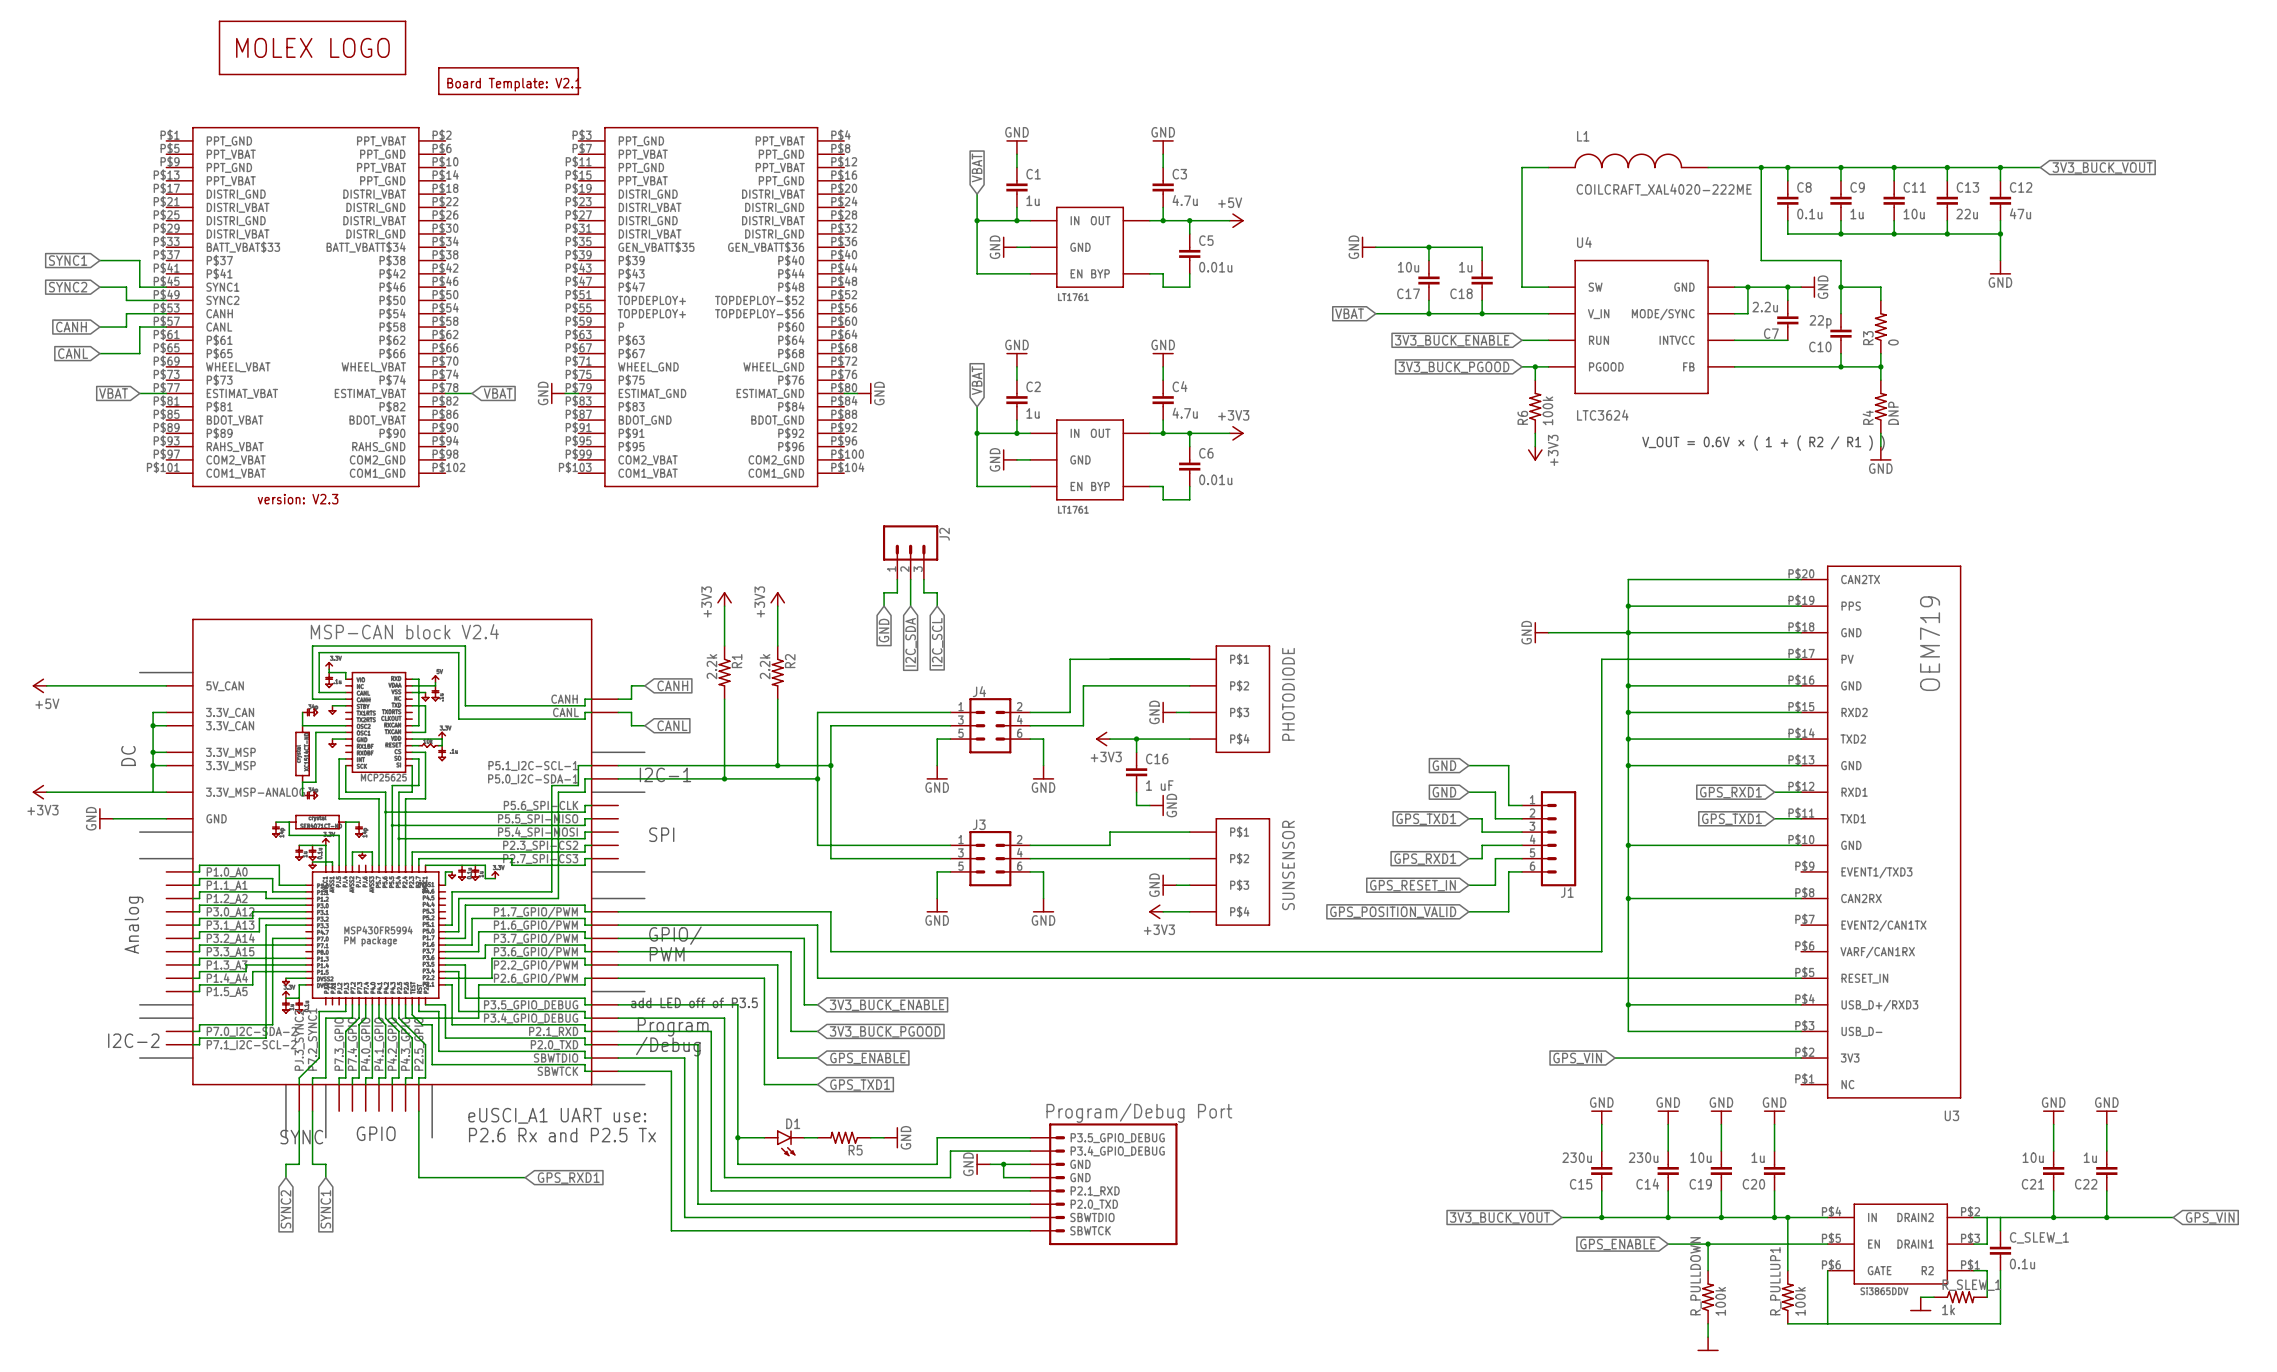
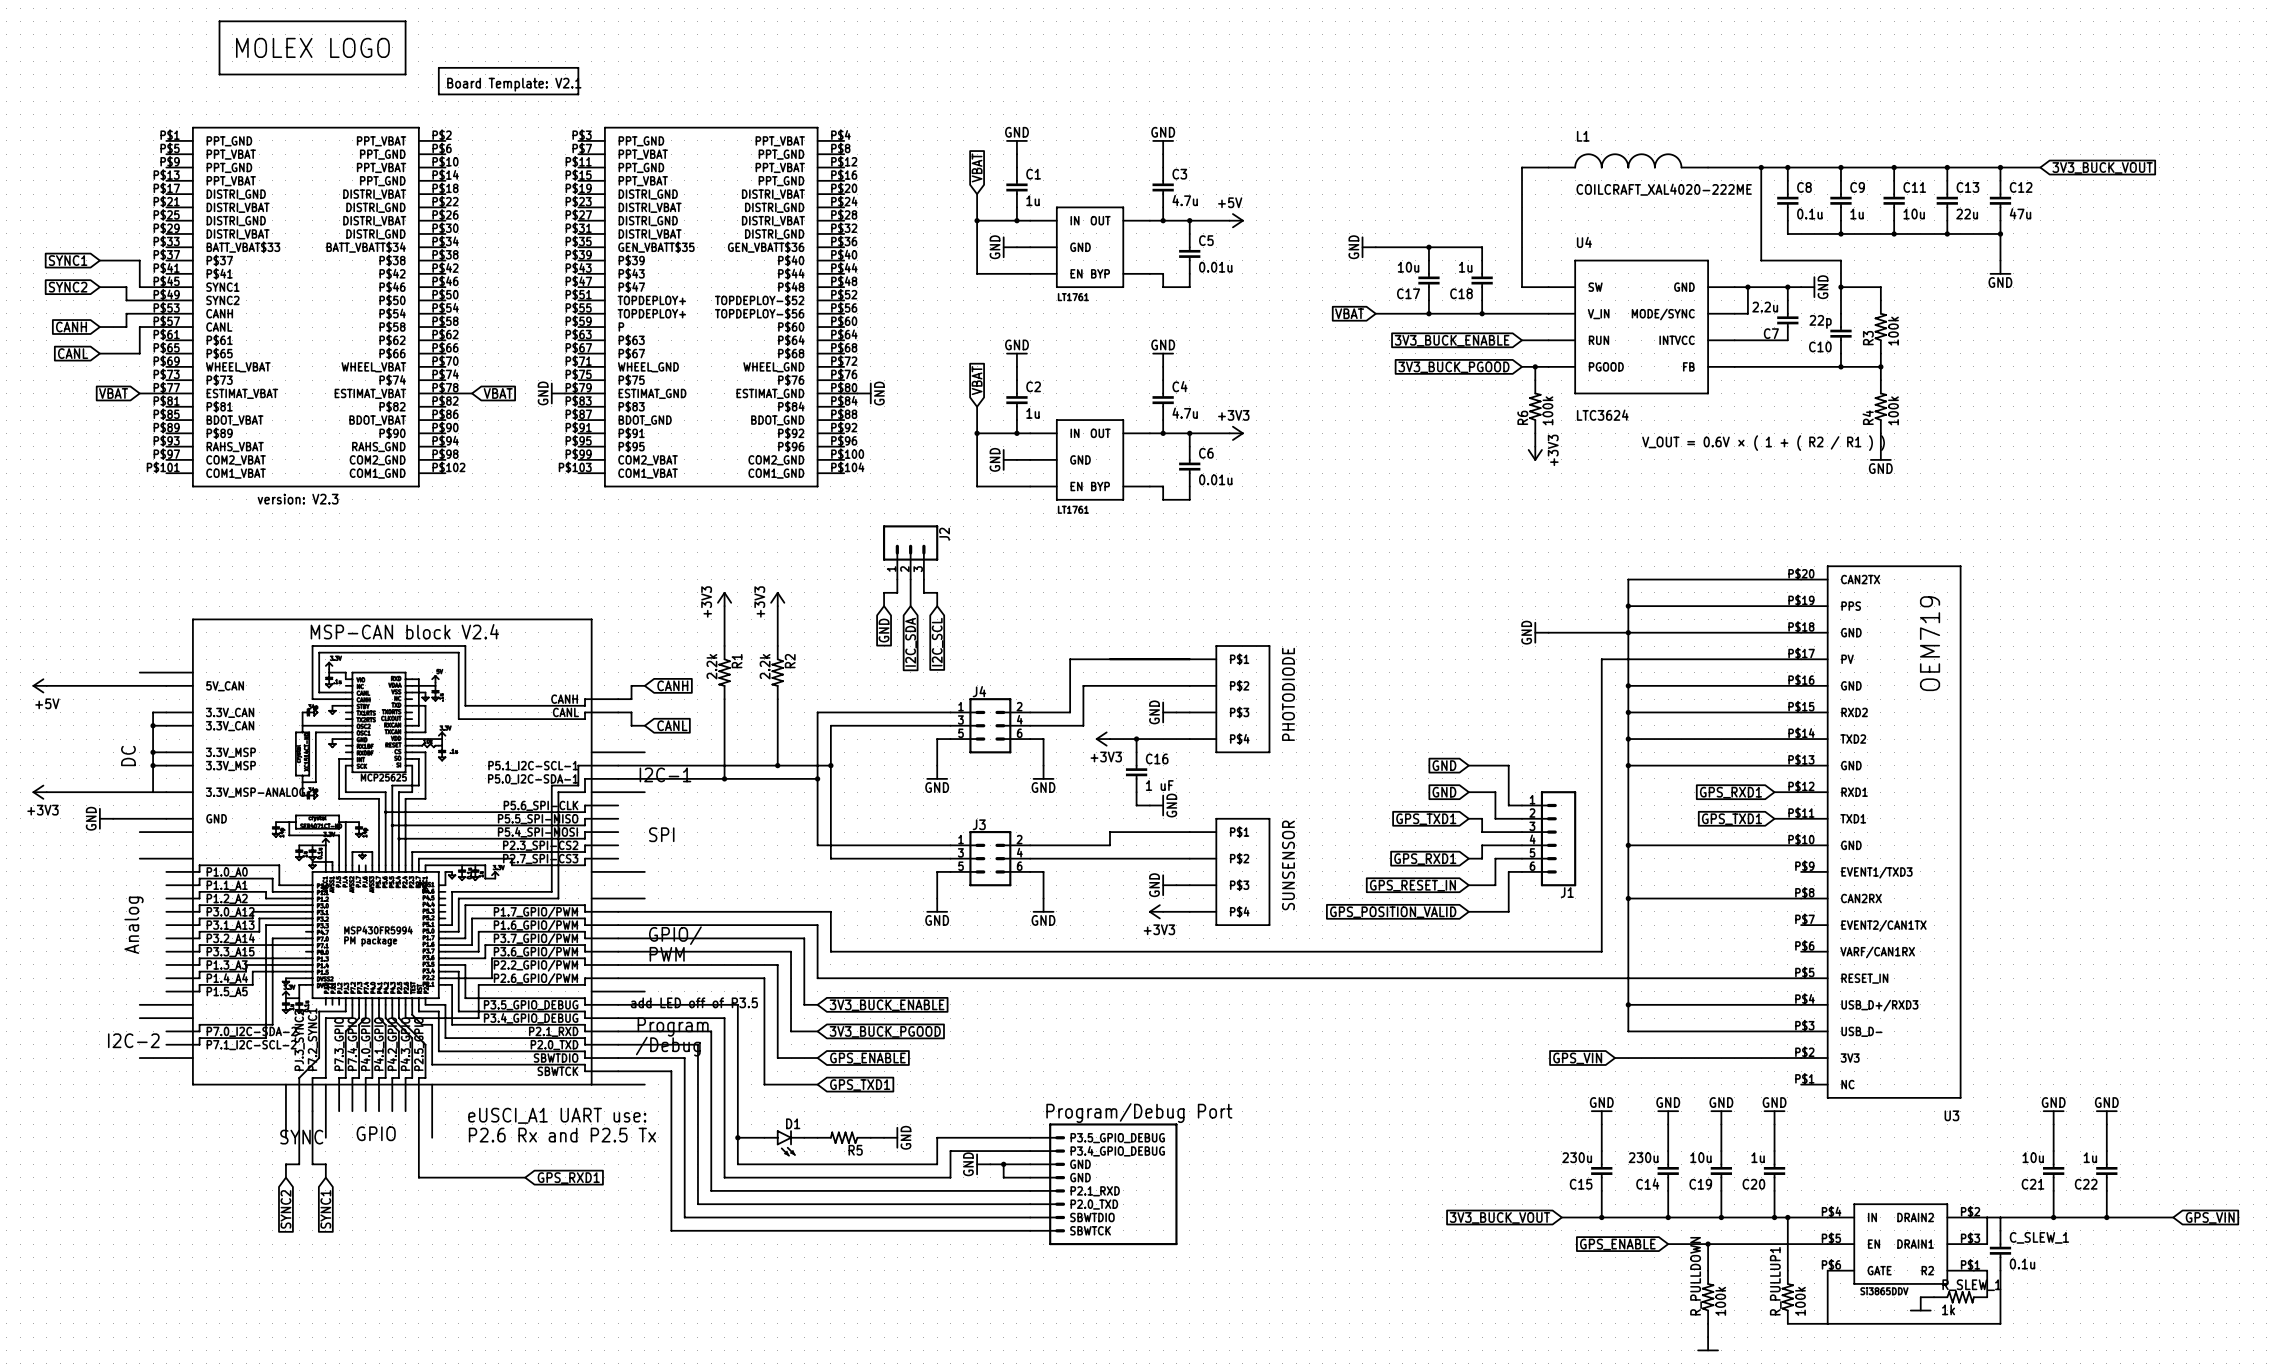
R3 value: 0 (1893, 342) -> 100k (1893, 331)
R4 value: DNP (1893, 413) -> 100k (1893, 410)

